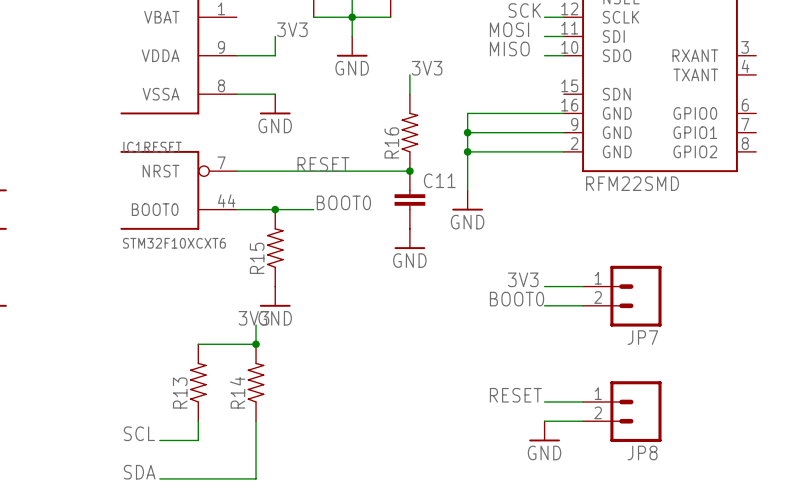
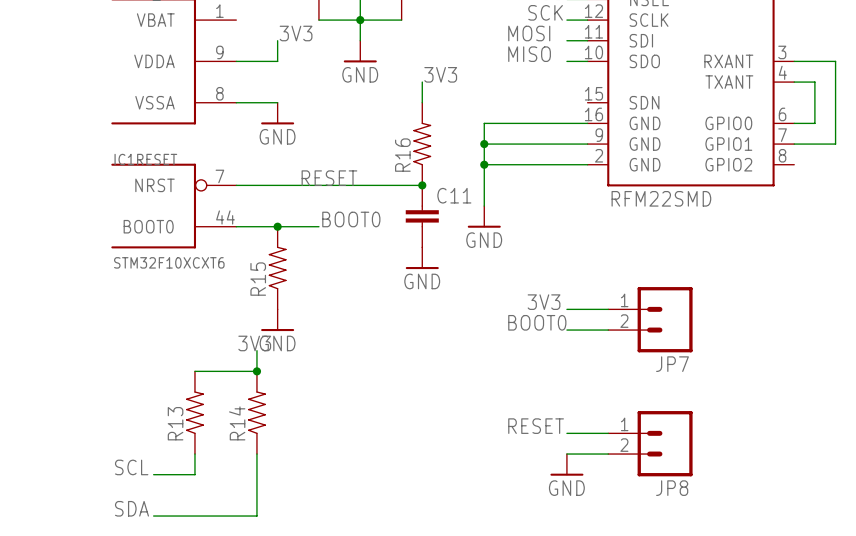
wire: none -> (794, 61) (835, 61) (835, 144) (794, 144)
wire: none -> (794, 82) (814, 82) (814, 123) (794, 123)

